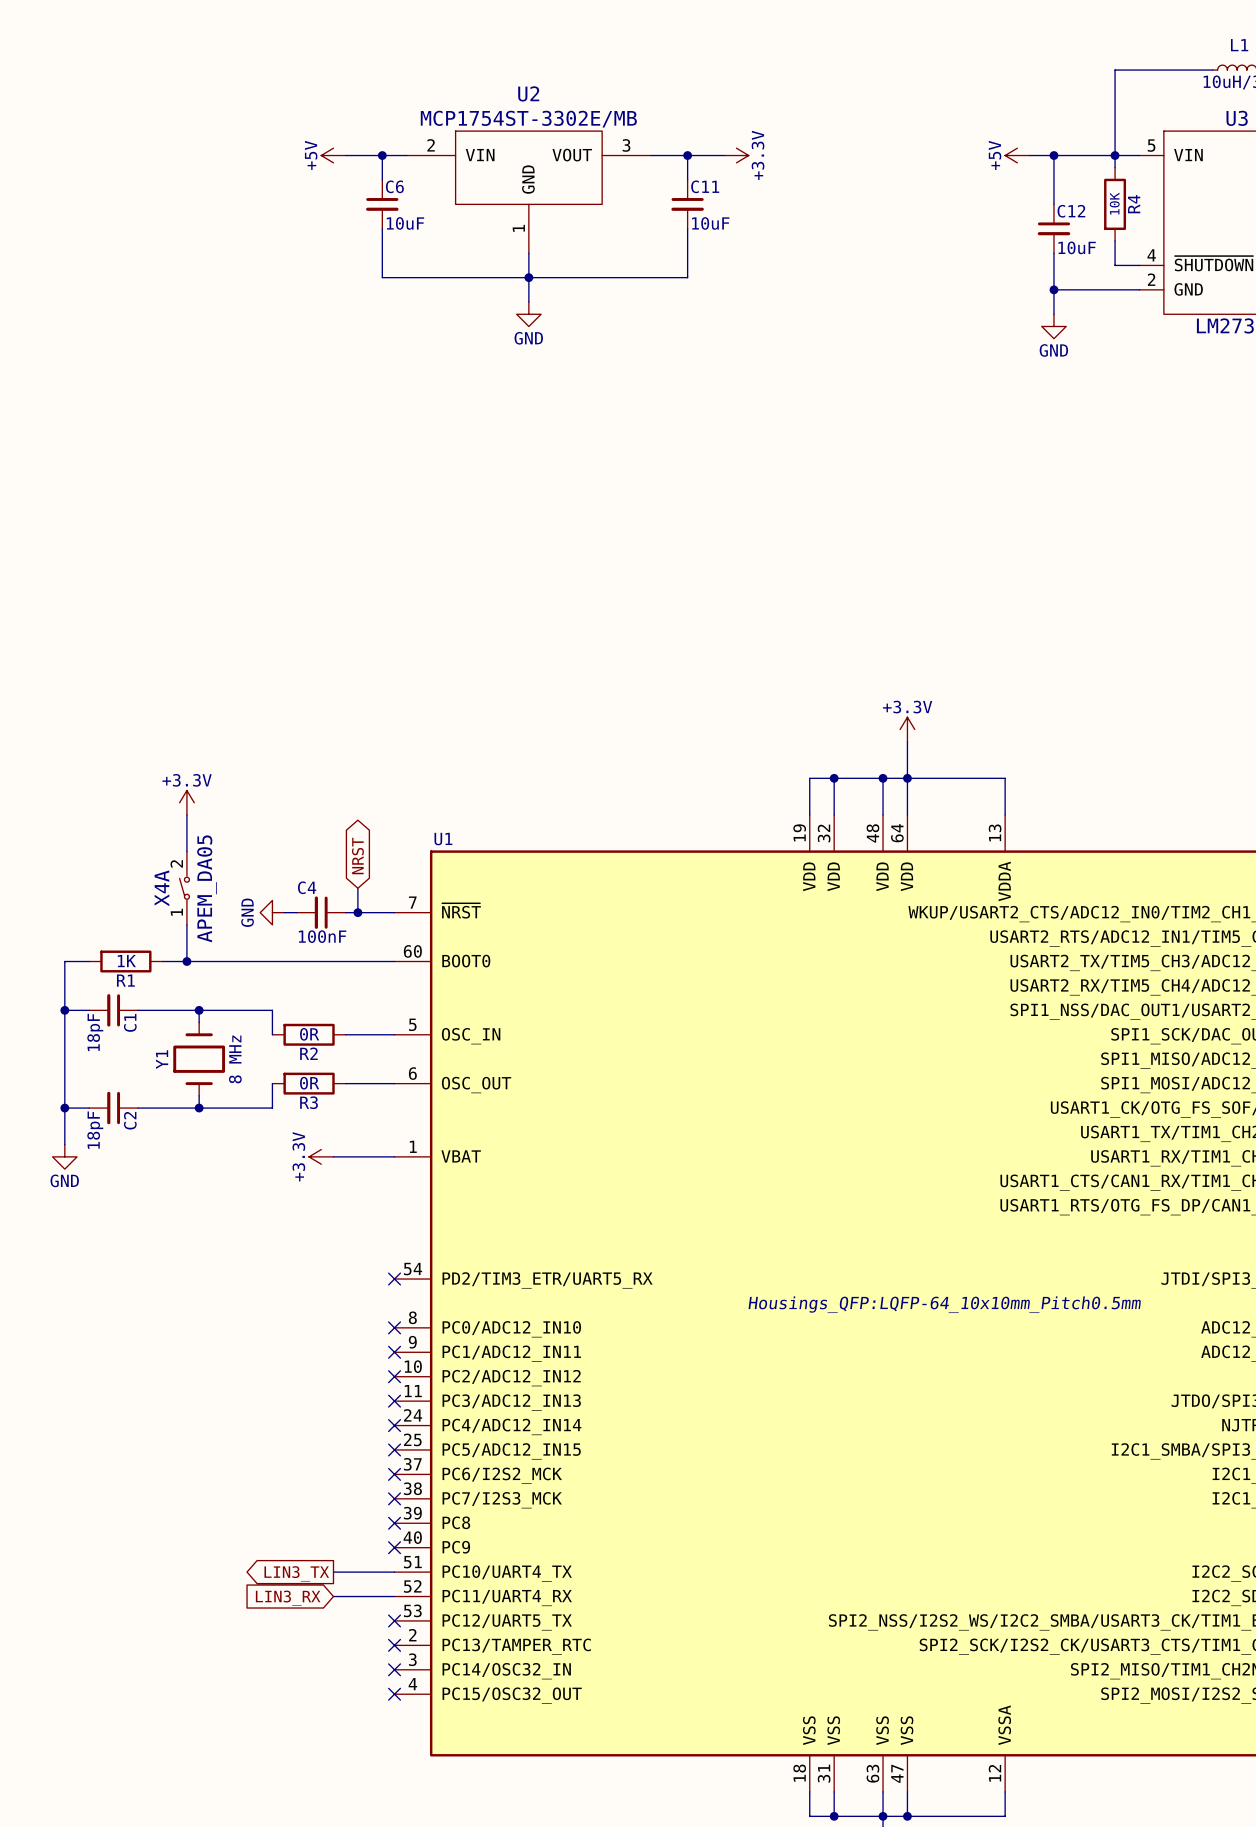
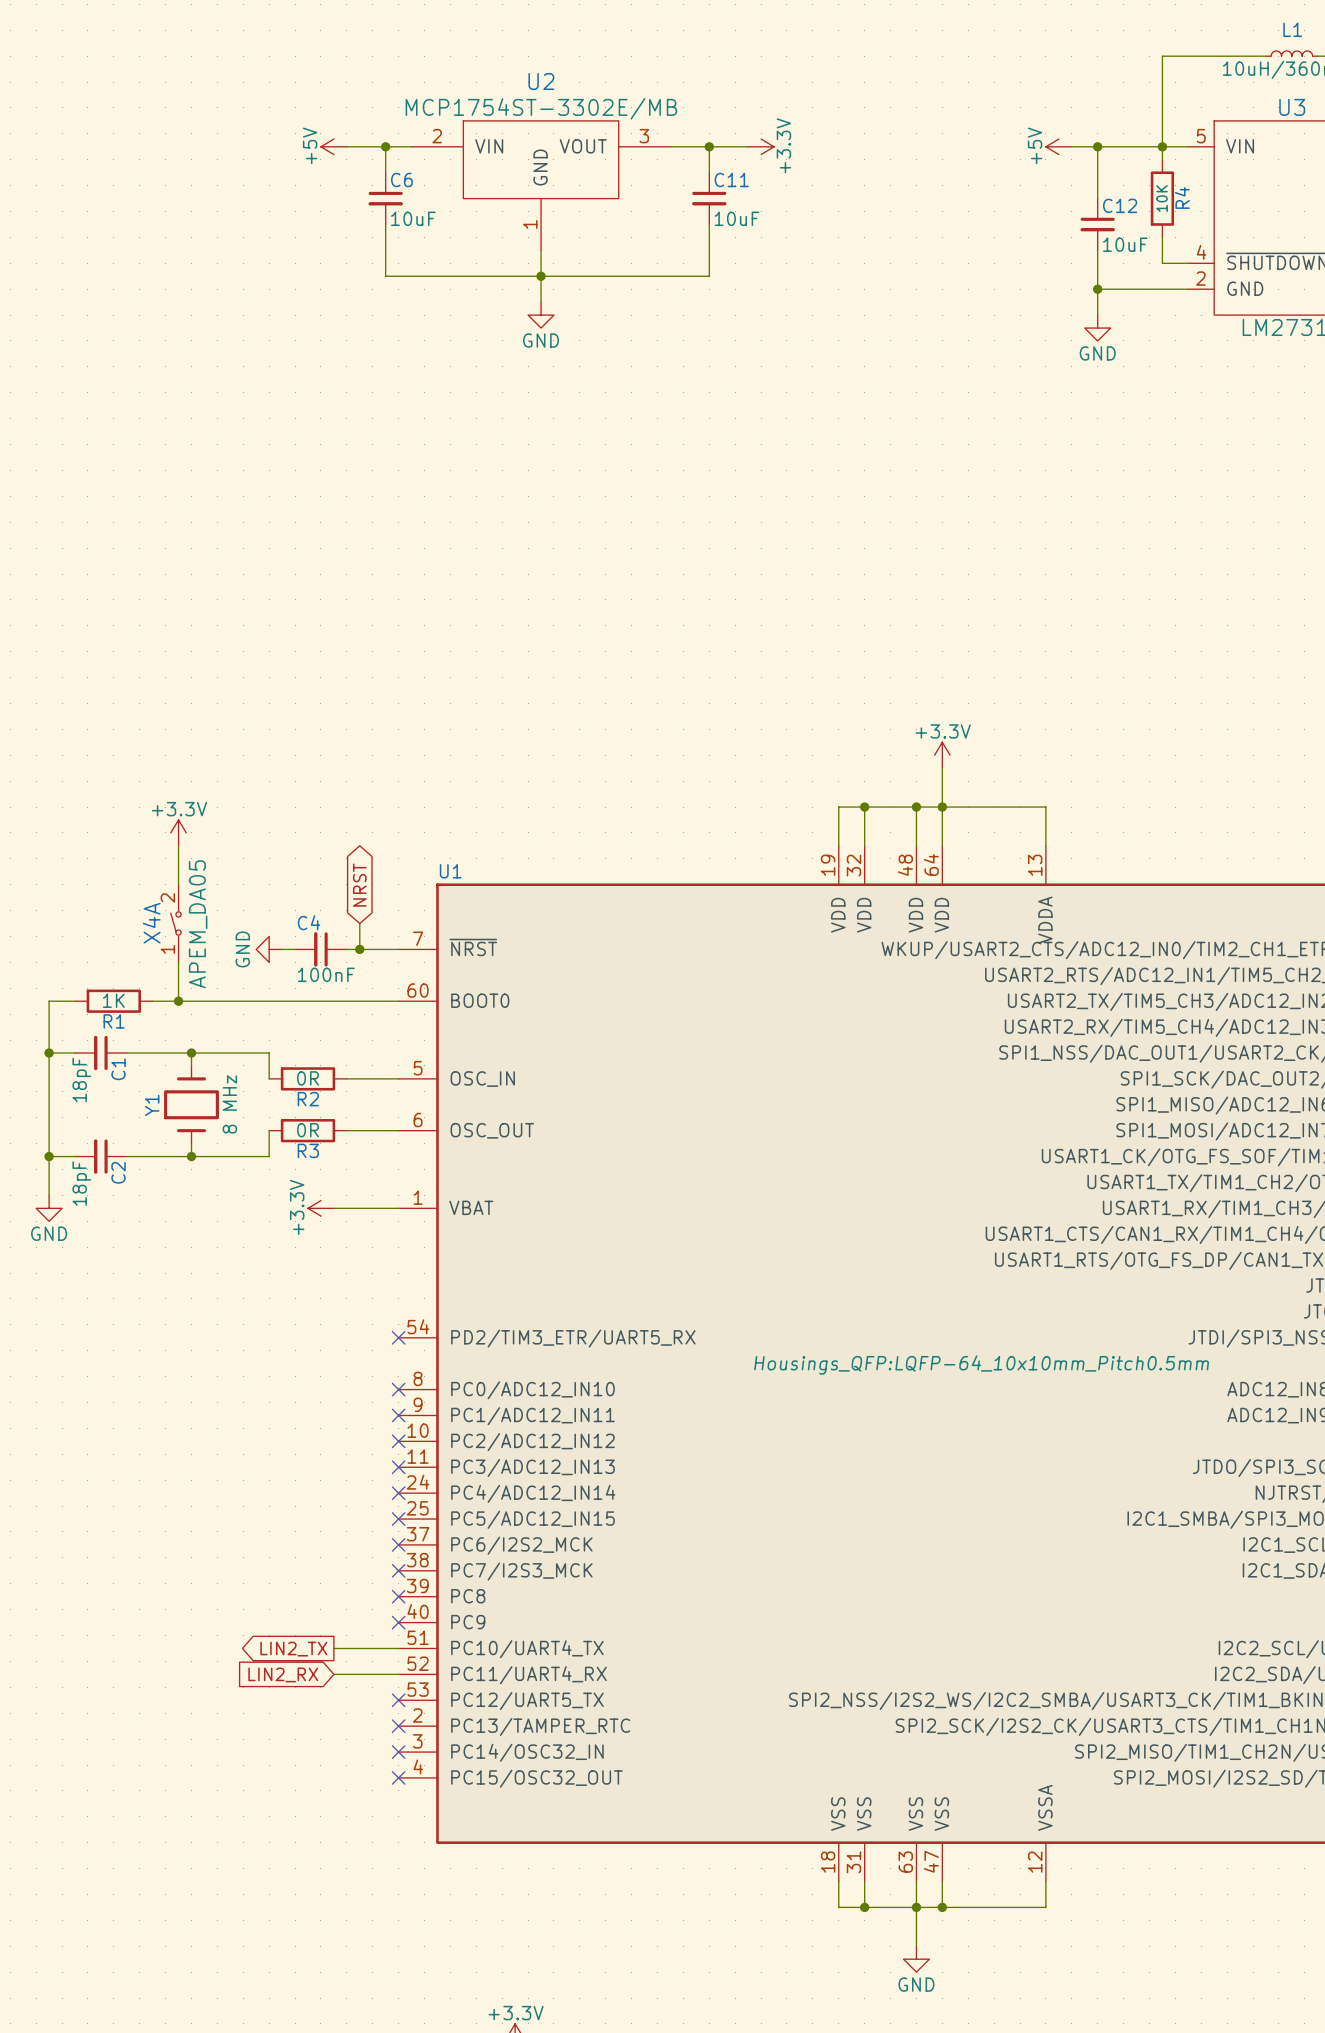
global label: LIN3_TX (296, 1573) -> LIN2_TX (293, 1649)
global label: LIN3_RX (288, 1598) -> LIN2_RX (283, 1674)

